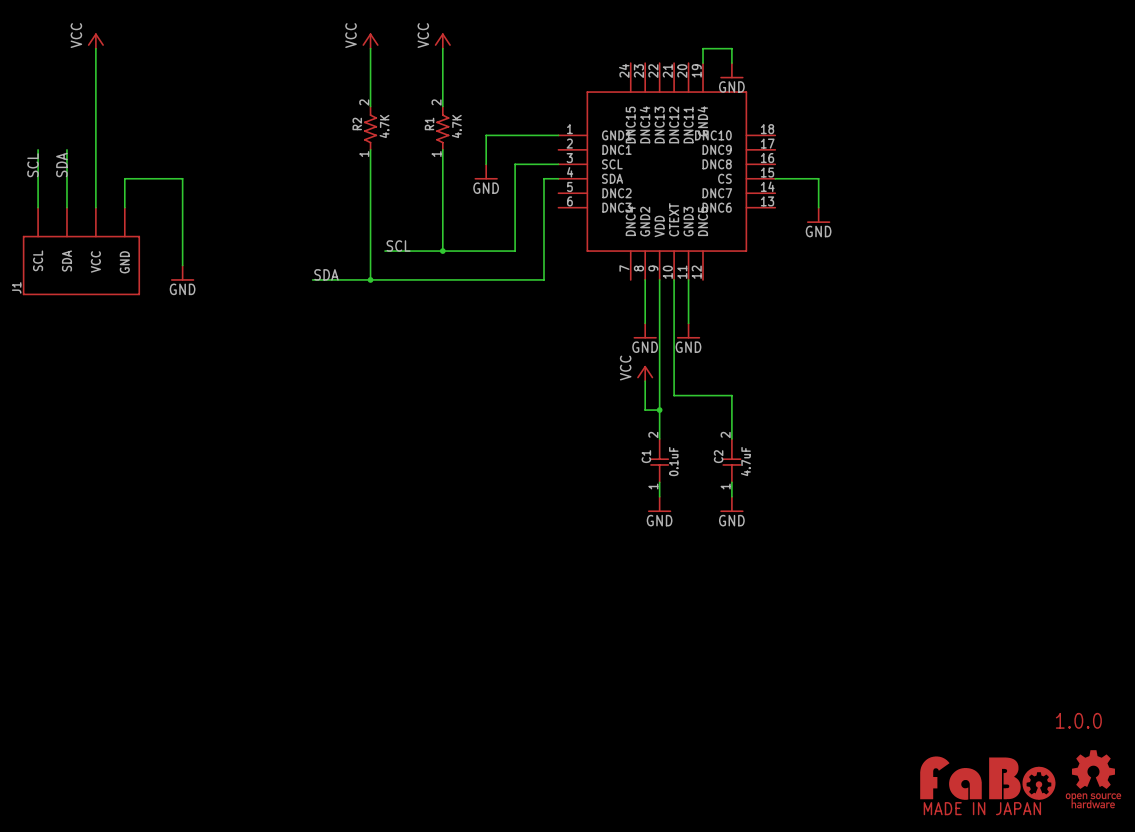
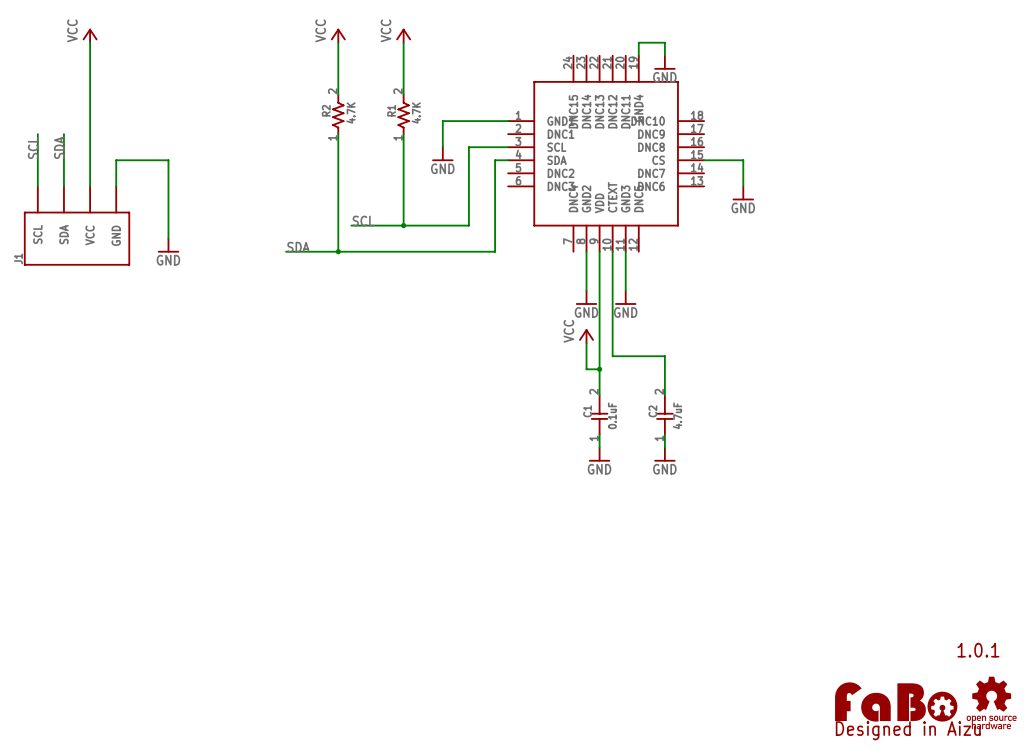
text: 1.0.0 (1078, 720) -> 1.0.1 (978, 650)
part text: MADE IN JAPAN (982, 808) -> none
part text: none -> Designed in Aizu (908, 730)

